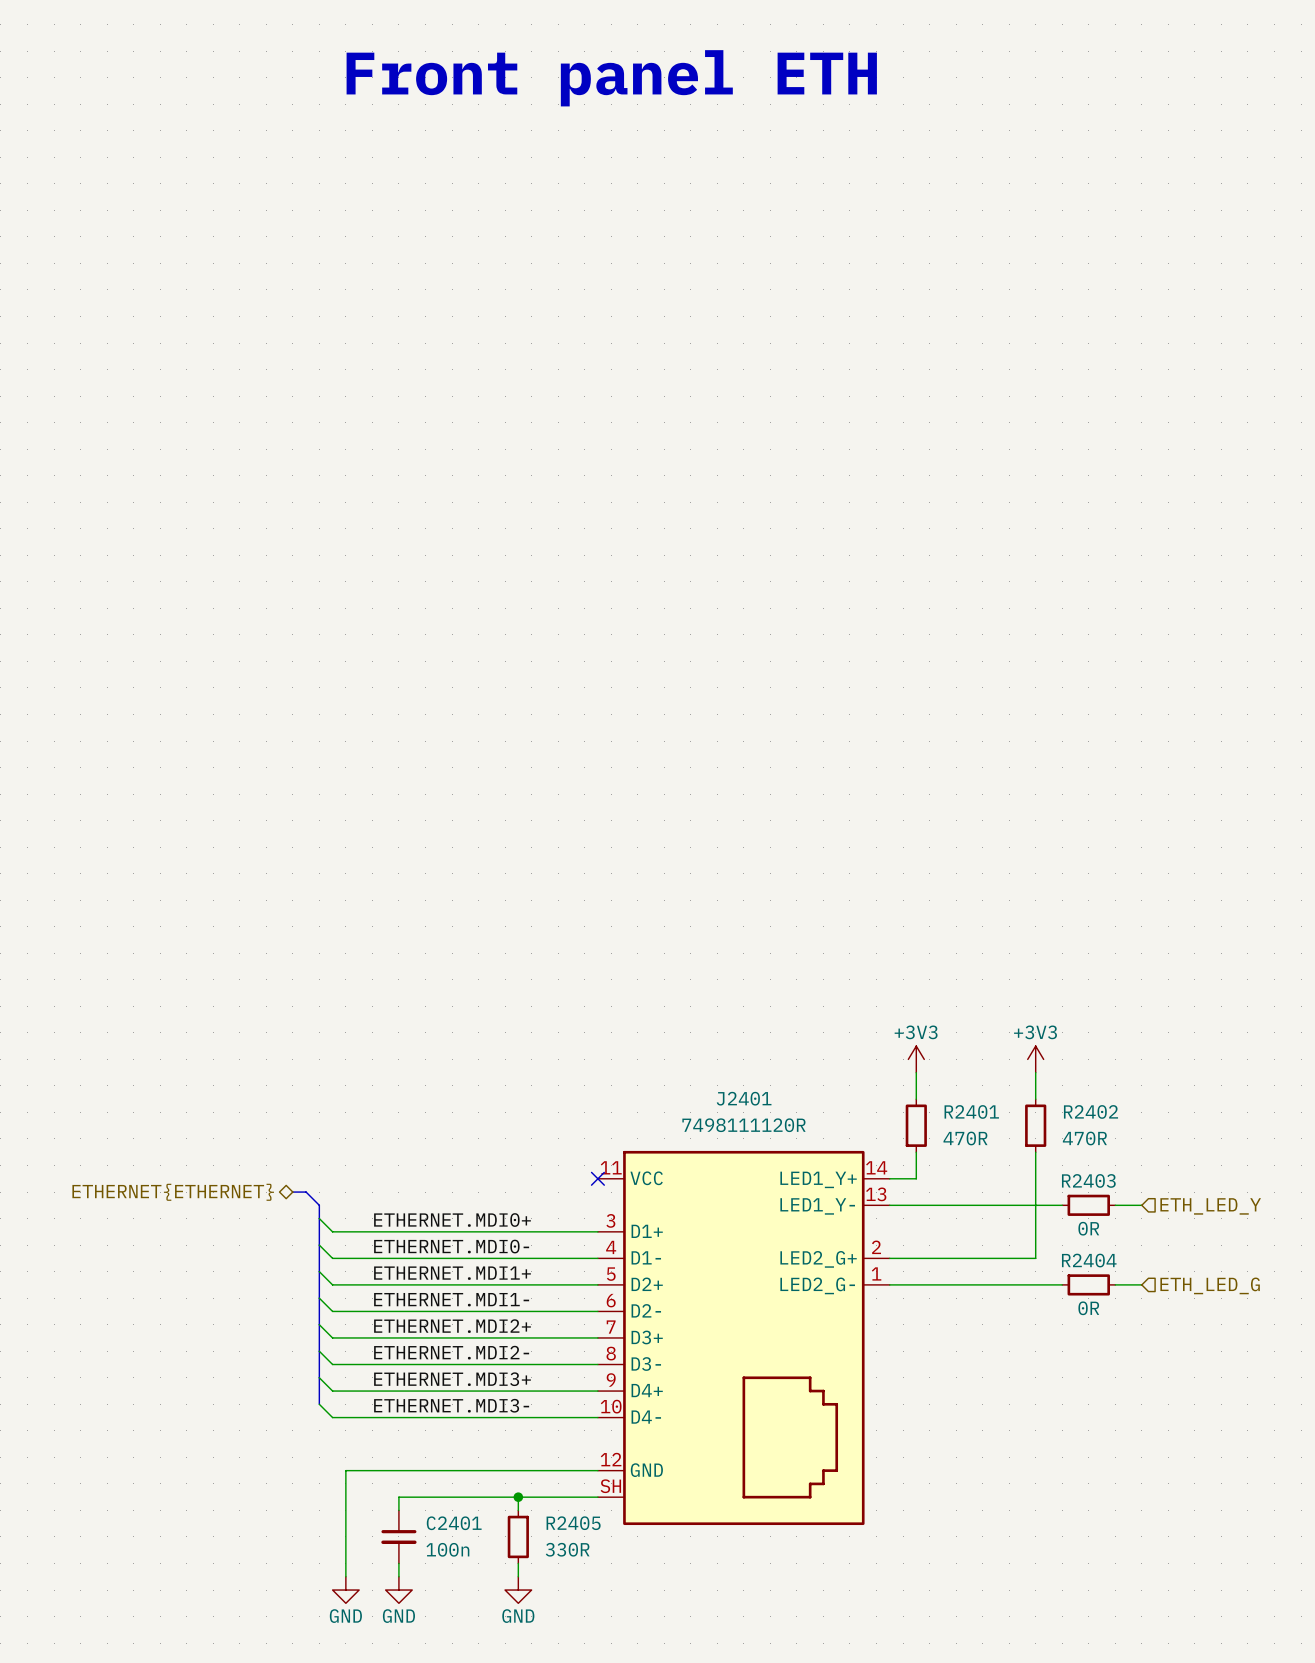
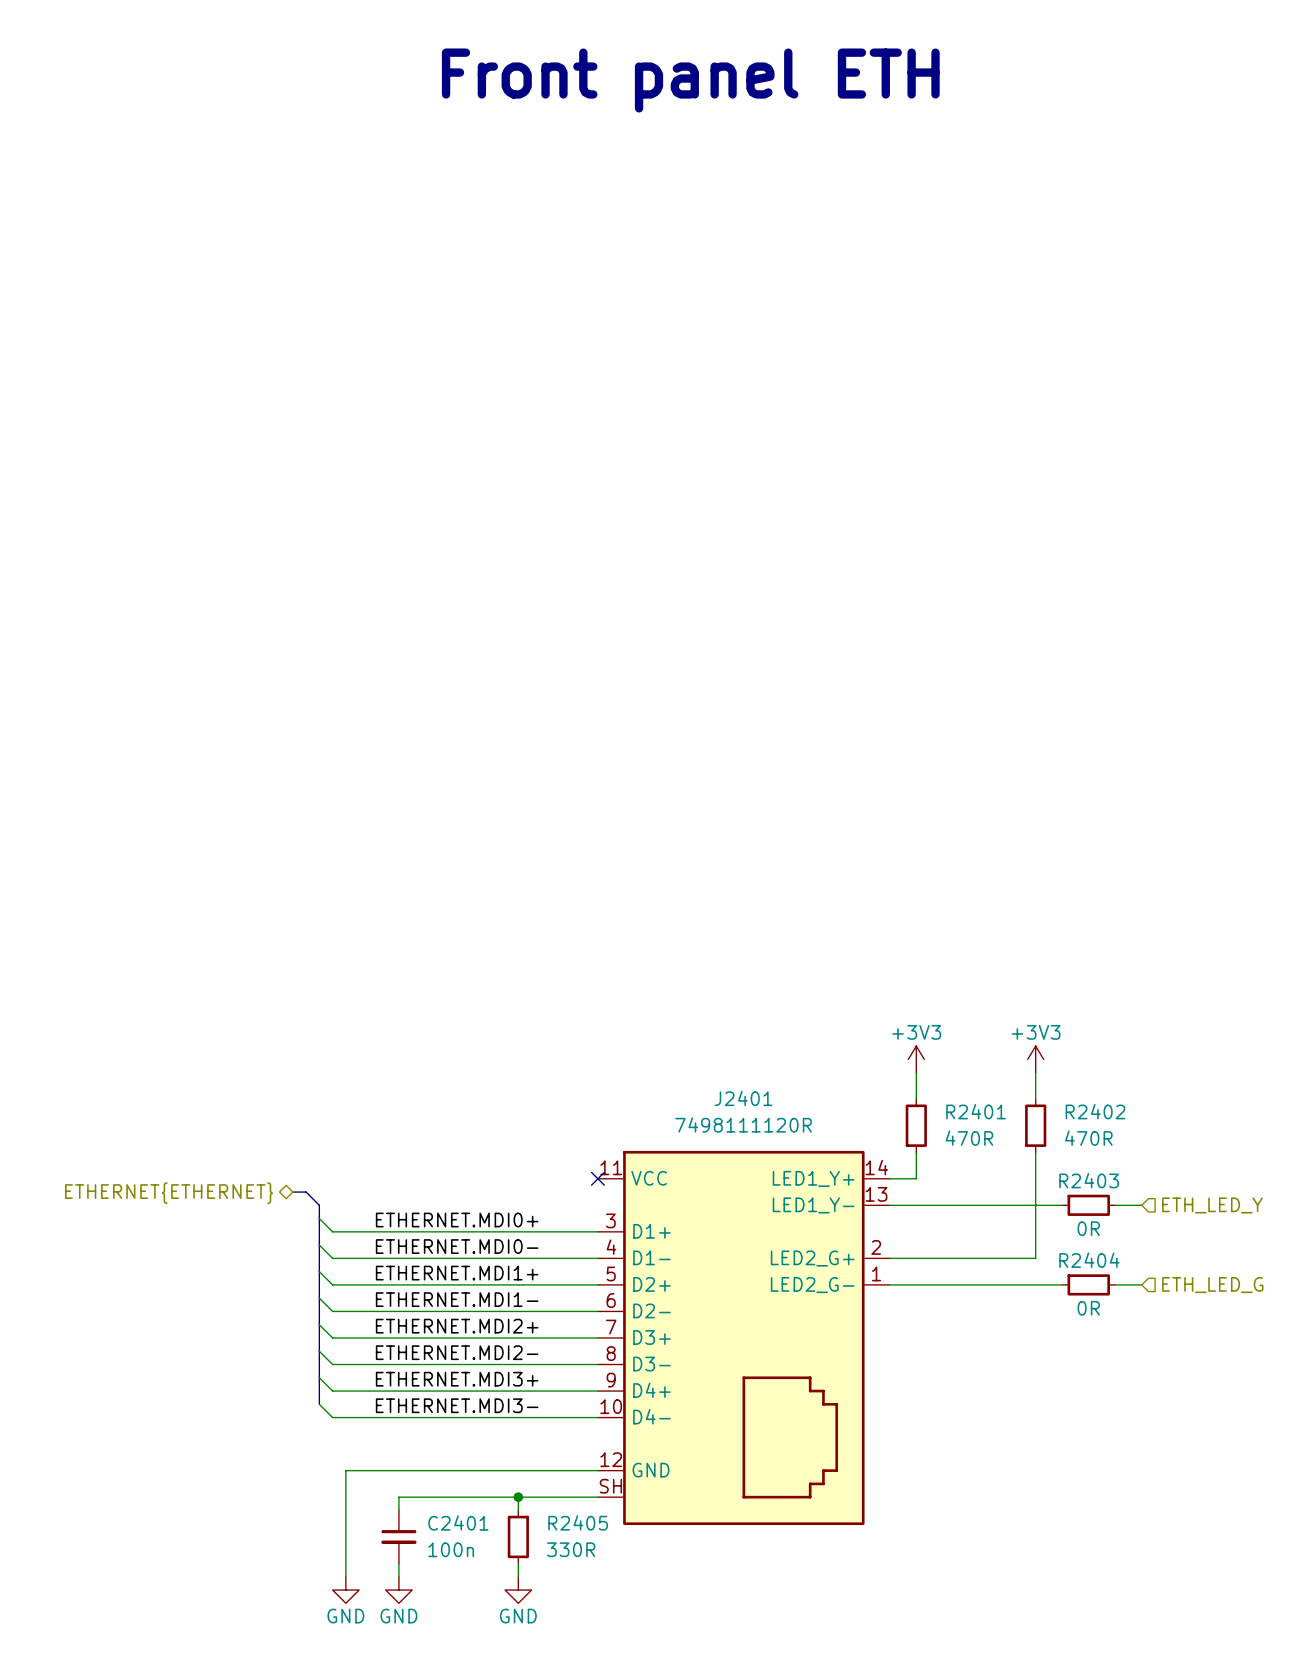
text position: Front panel ETH (611, 78) -> Front panel ETH (690, 80)

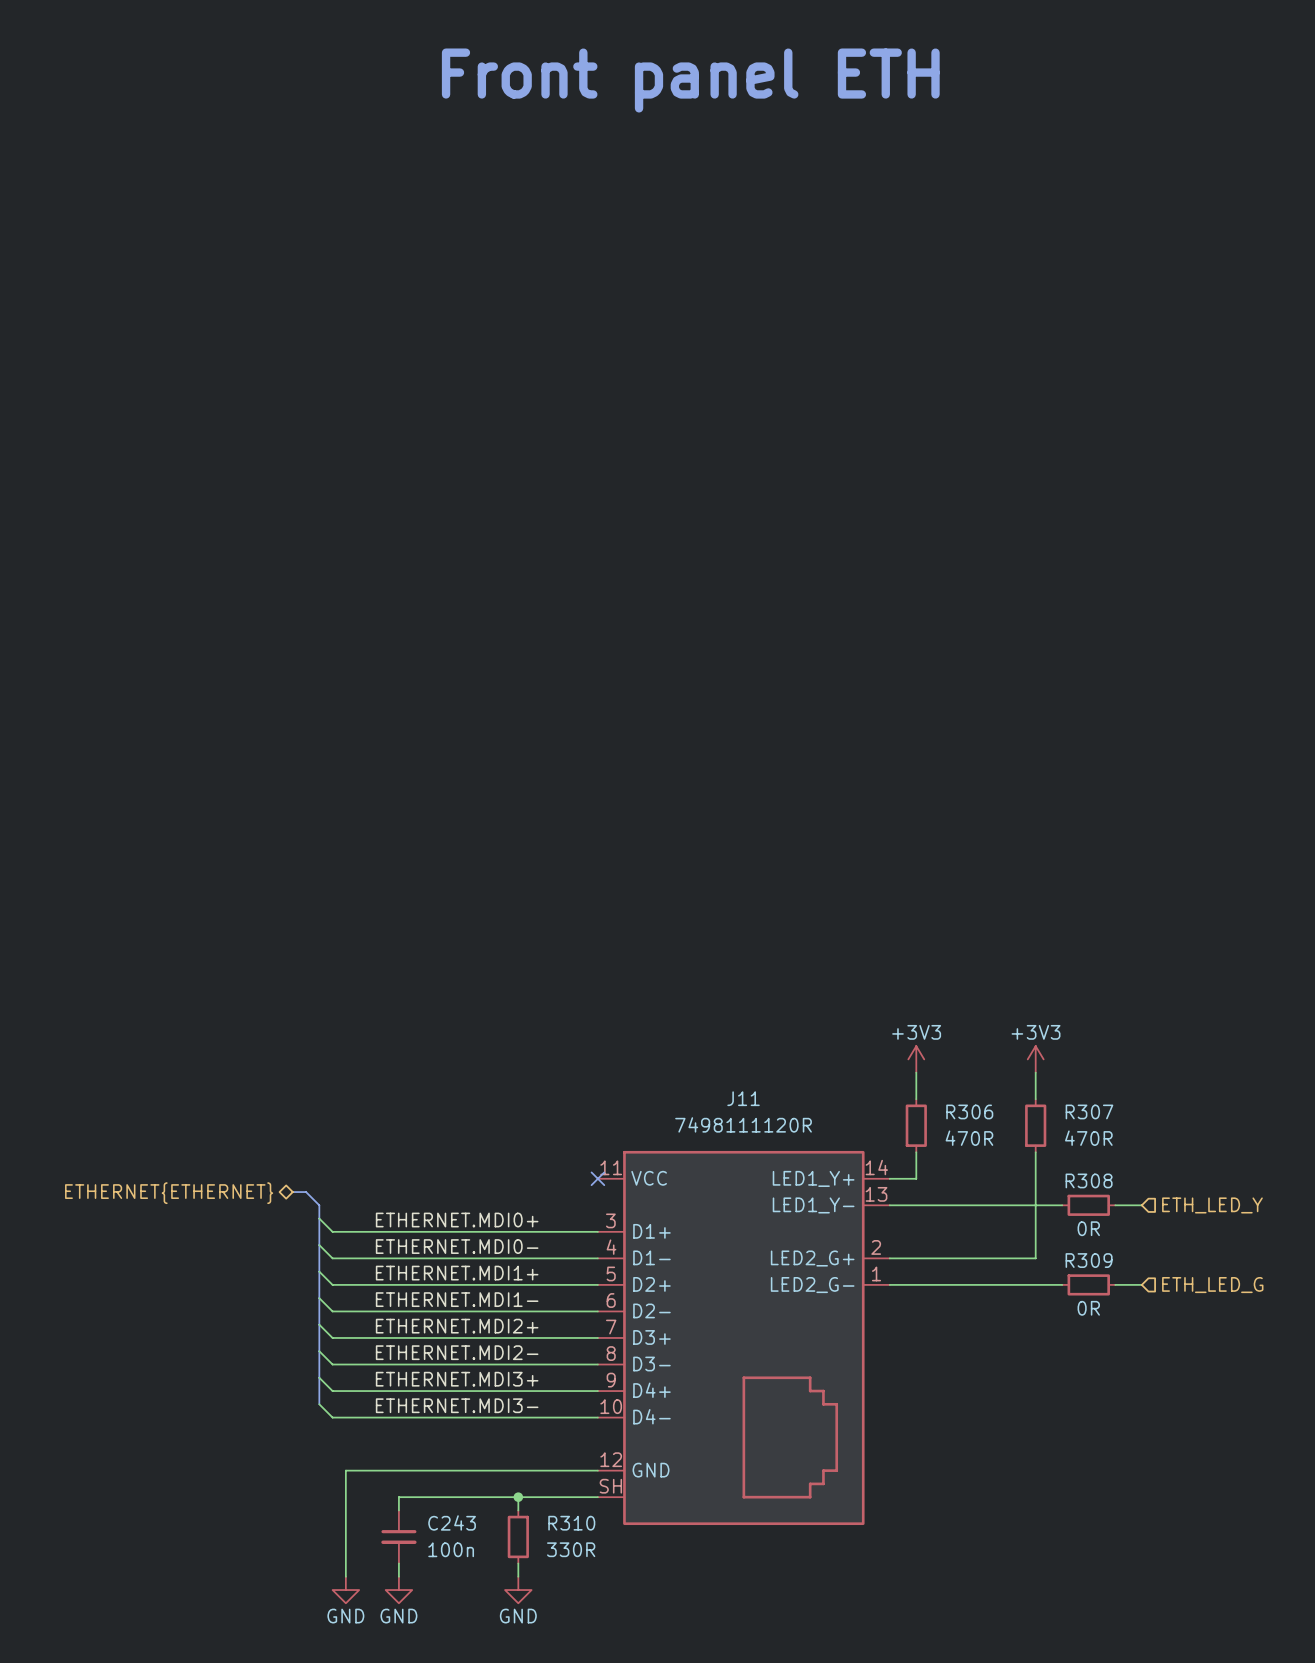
J2401 name: J2401 (743, 1098) -> J11 (743, 1098)
R2401 name: R2401 (976, 1111) -> R306 (969, 1111)
R2402 name: R2402 (1095, 1111) -> R307 (1089, 1111)
R2403 name: R2403 (1089, 1180) -> R308 (1089, 1180)
R2404 name: R2404 (1089, 1260) -> R309 (1089, 1260)
C2401 name: C2401 (458, 1522) -> C243 (452, 1522)
R2405 name: R2405 (578, 1522) -> R310 (571, 1523)

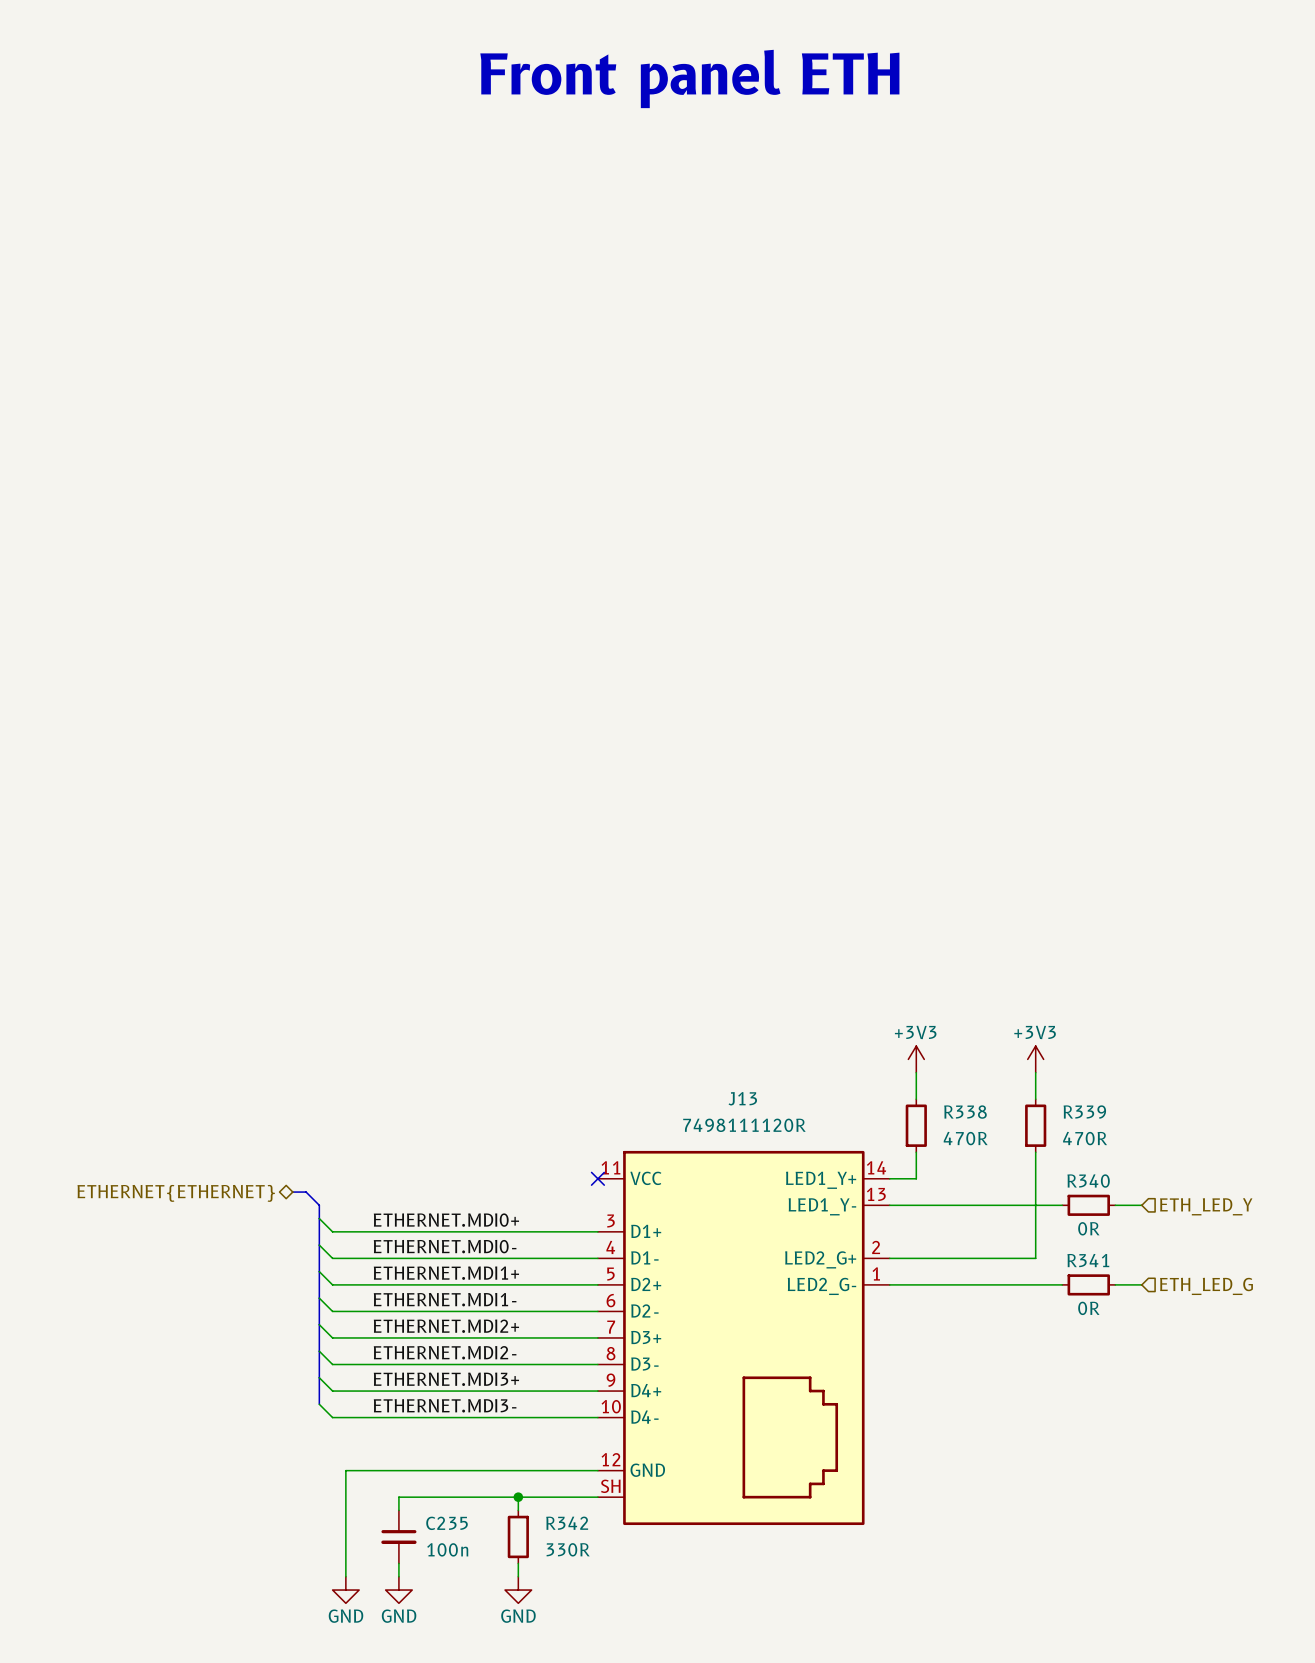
J11 name: J11 (743, 1098) -> J13 (742, 1098)
R306 name: R306 (969, 1111) -> R338 (965, 1112)
R307 name: R307 (1089, 1111) -> R339 (1084, 1112)
R308 name: R308 (1089, 1180) -> R340 (1088, 1181)
R309 name: R309 (1089, 1260) -> R341 (1088, 1260)
C243 name: C243 (452, 1522) -> C235 (447, 1523)
R310 name: R310 (571, 1523) -> R342 (567, 1523)

